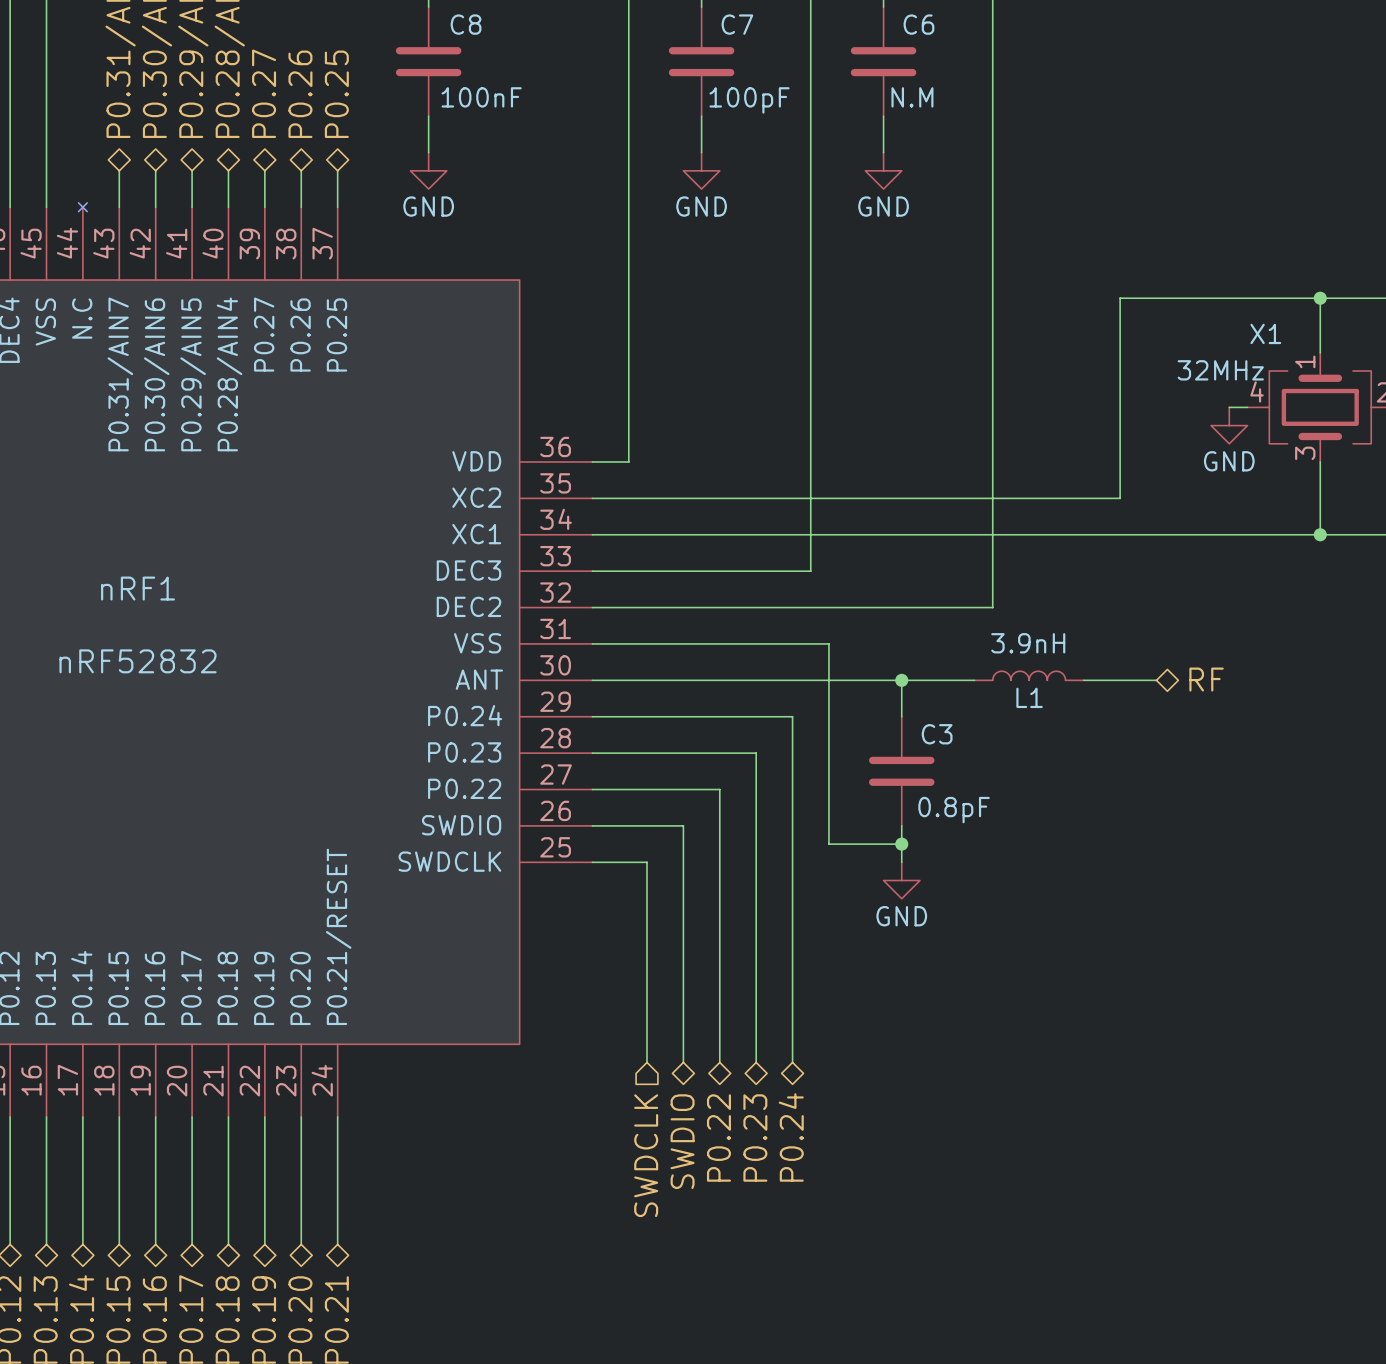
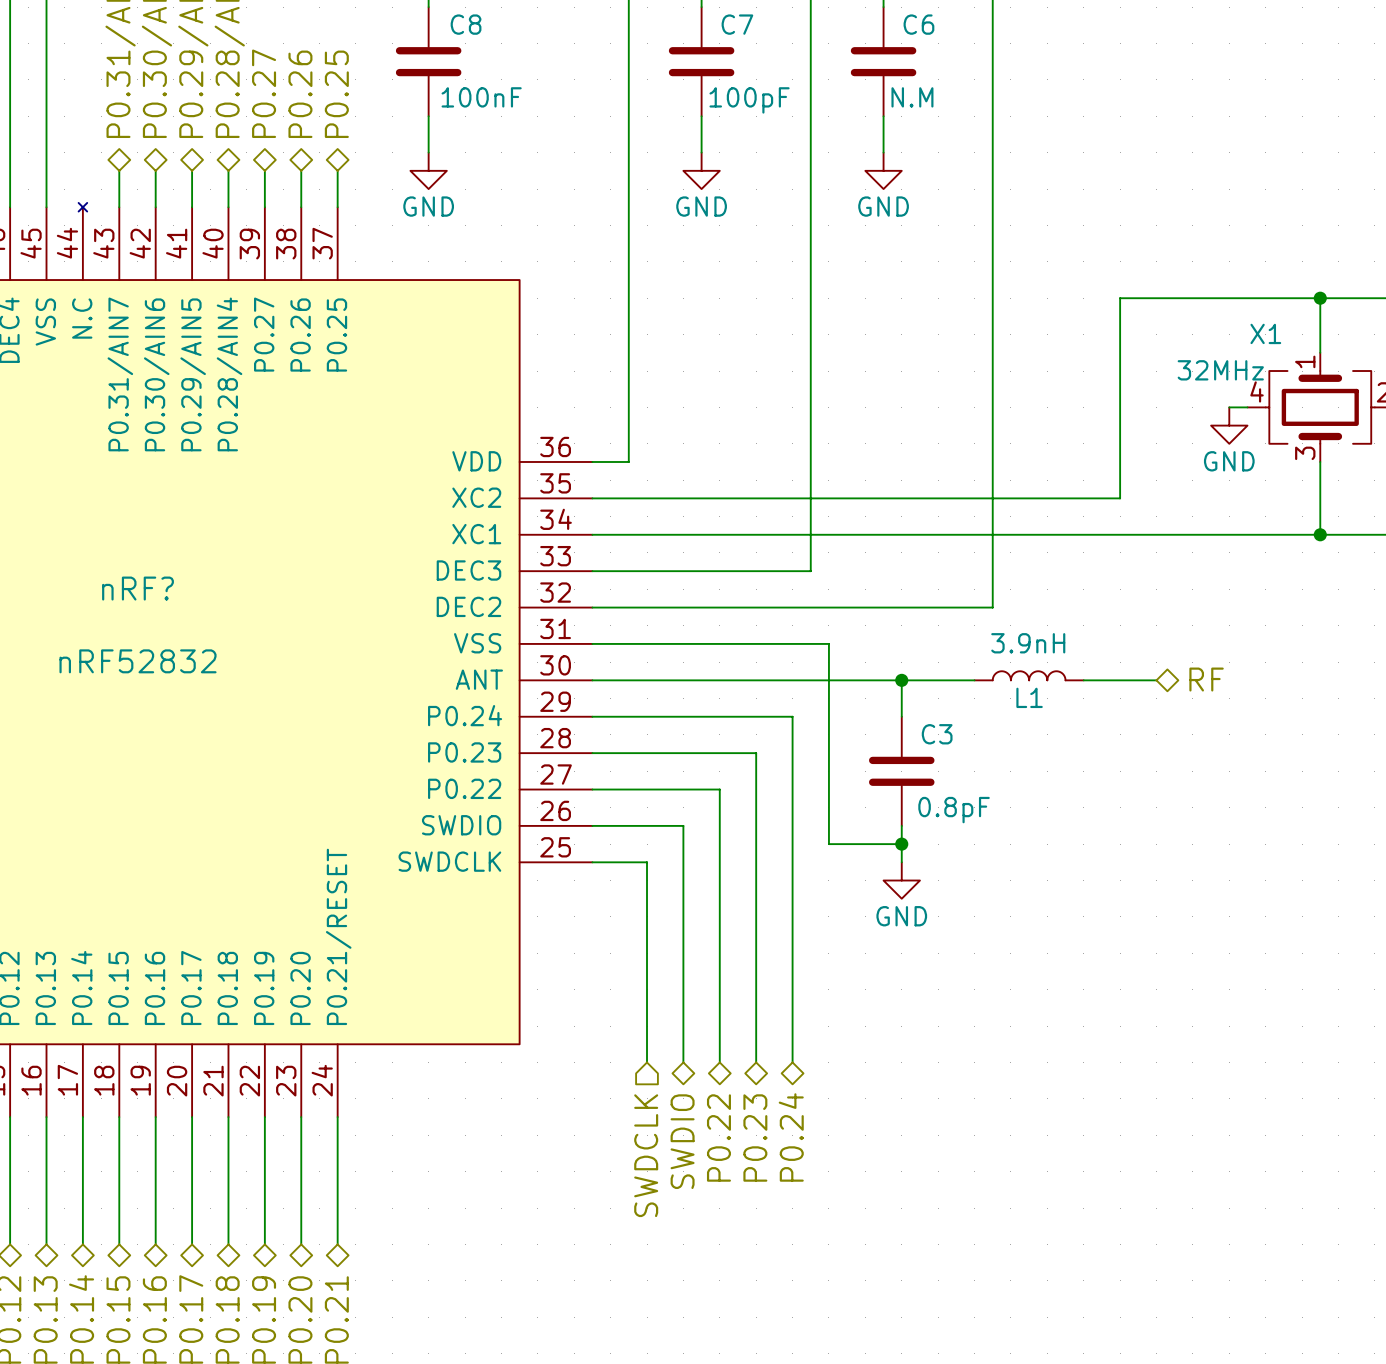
nRF1 name: nRF1 (138, 588) -> nRF? (138, 588)

